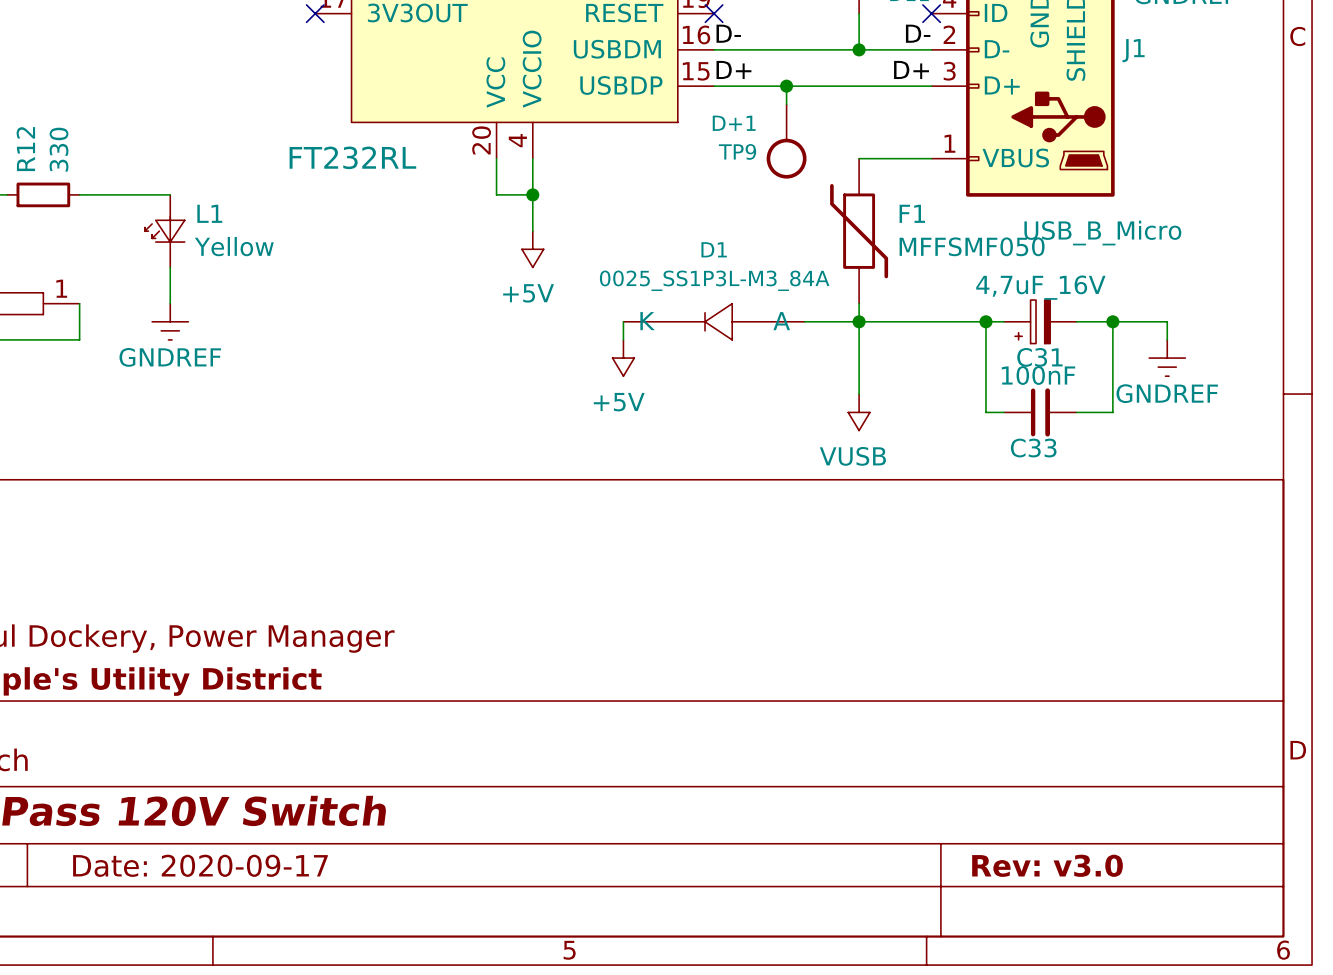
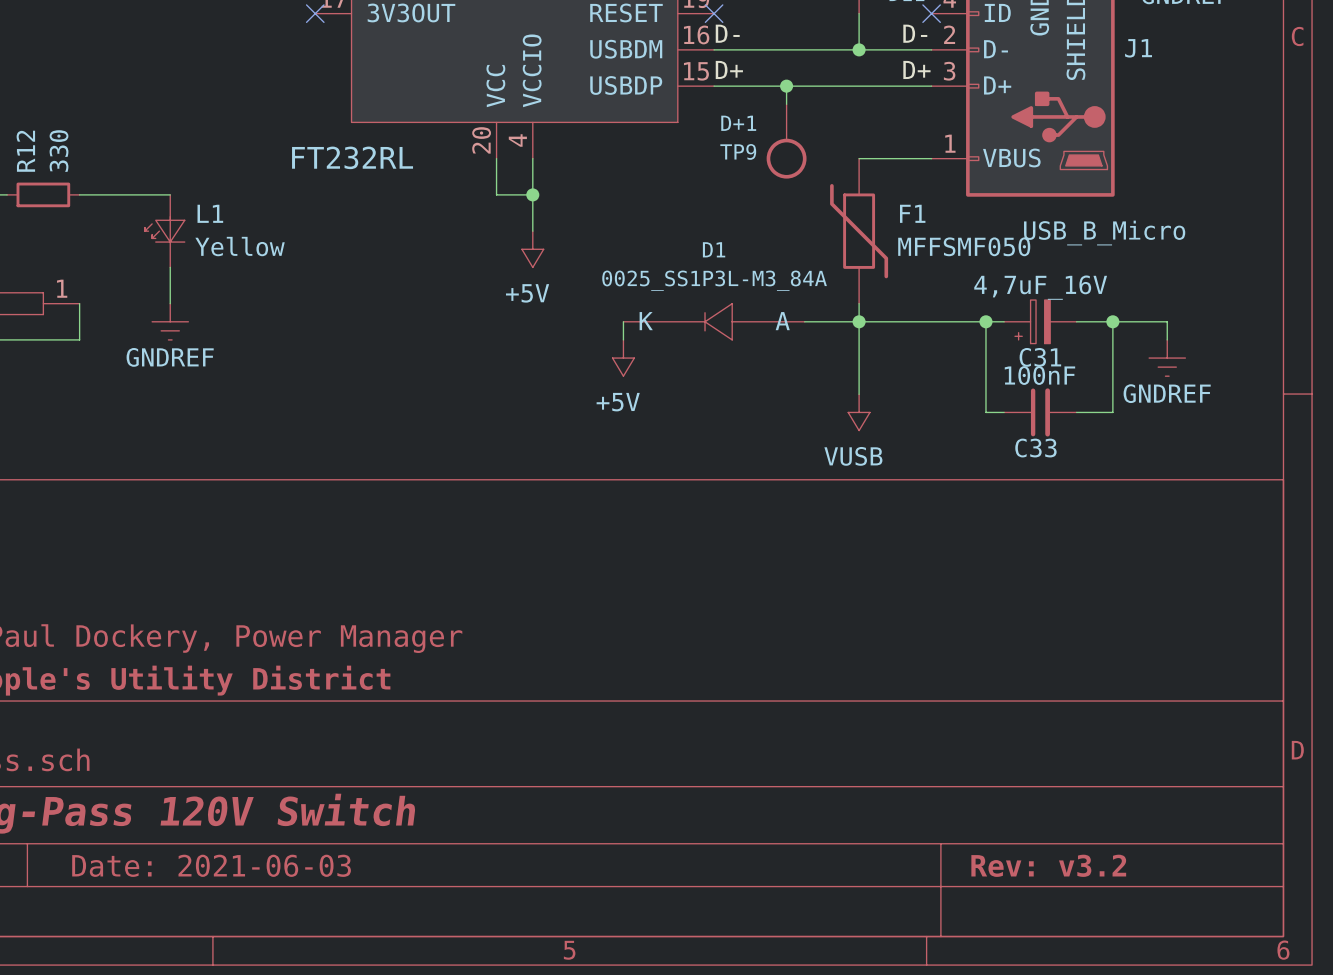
title block: Date: 2020-09-17 (200, 865) -> Date: 2021-06-03 (211, 865)
title block: Rev: v3.0 (1047, 865) -> Rev: v3.2 (1048, 865)

